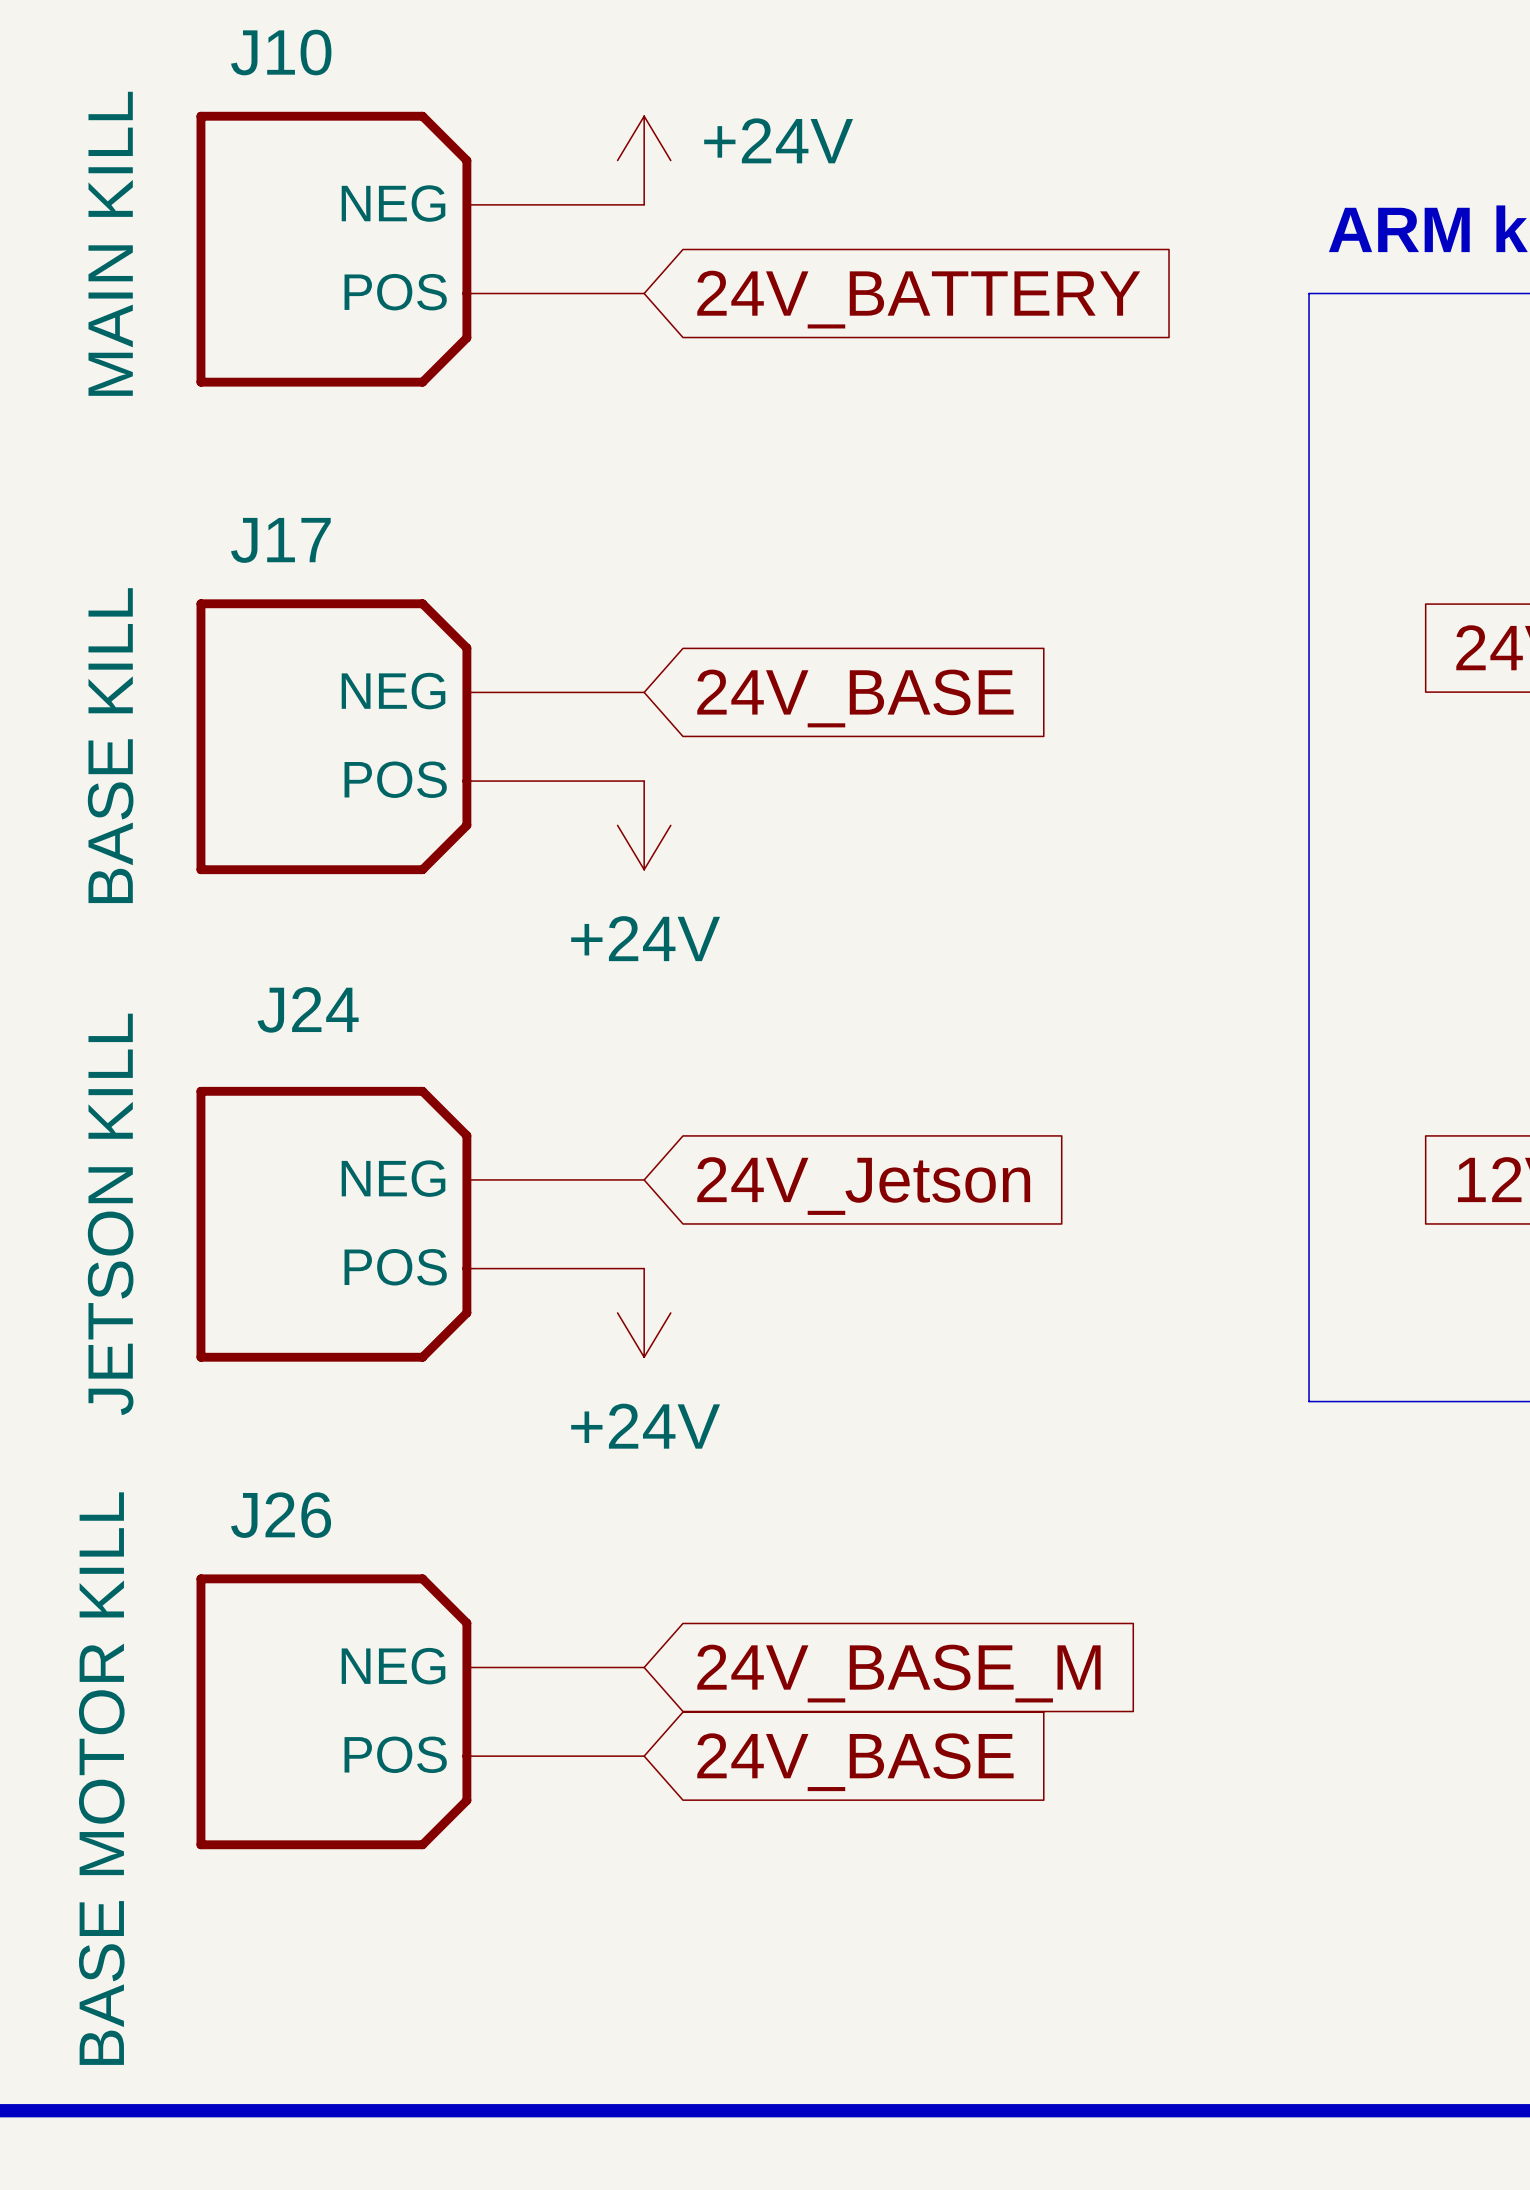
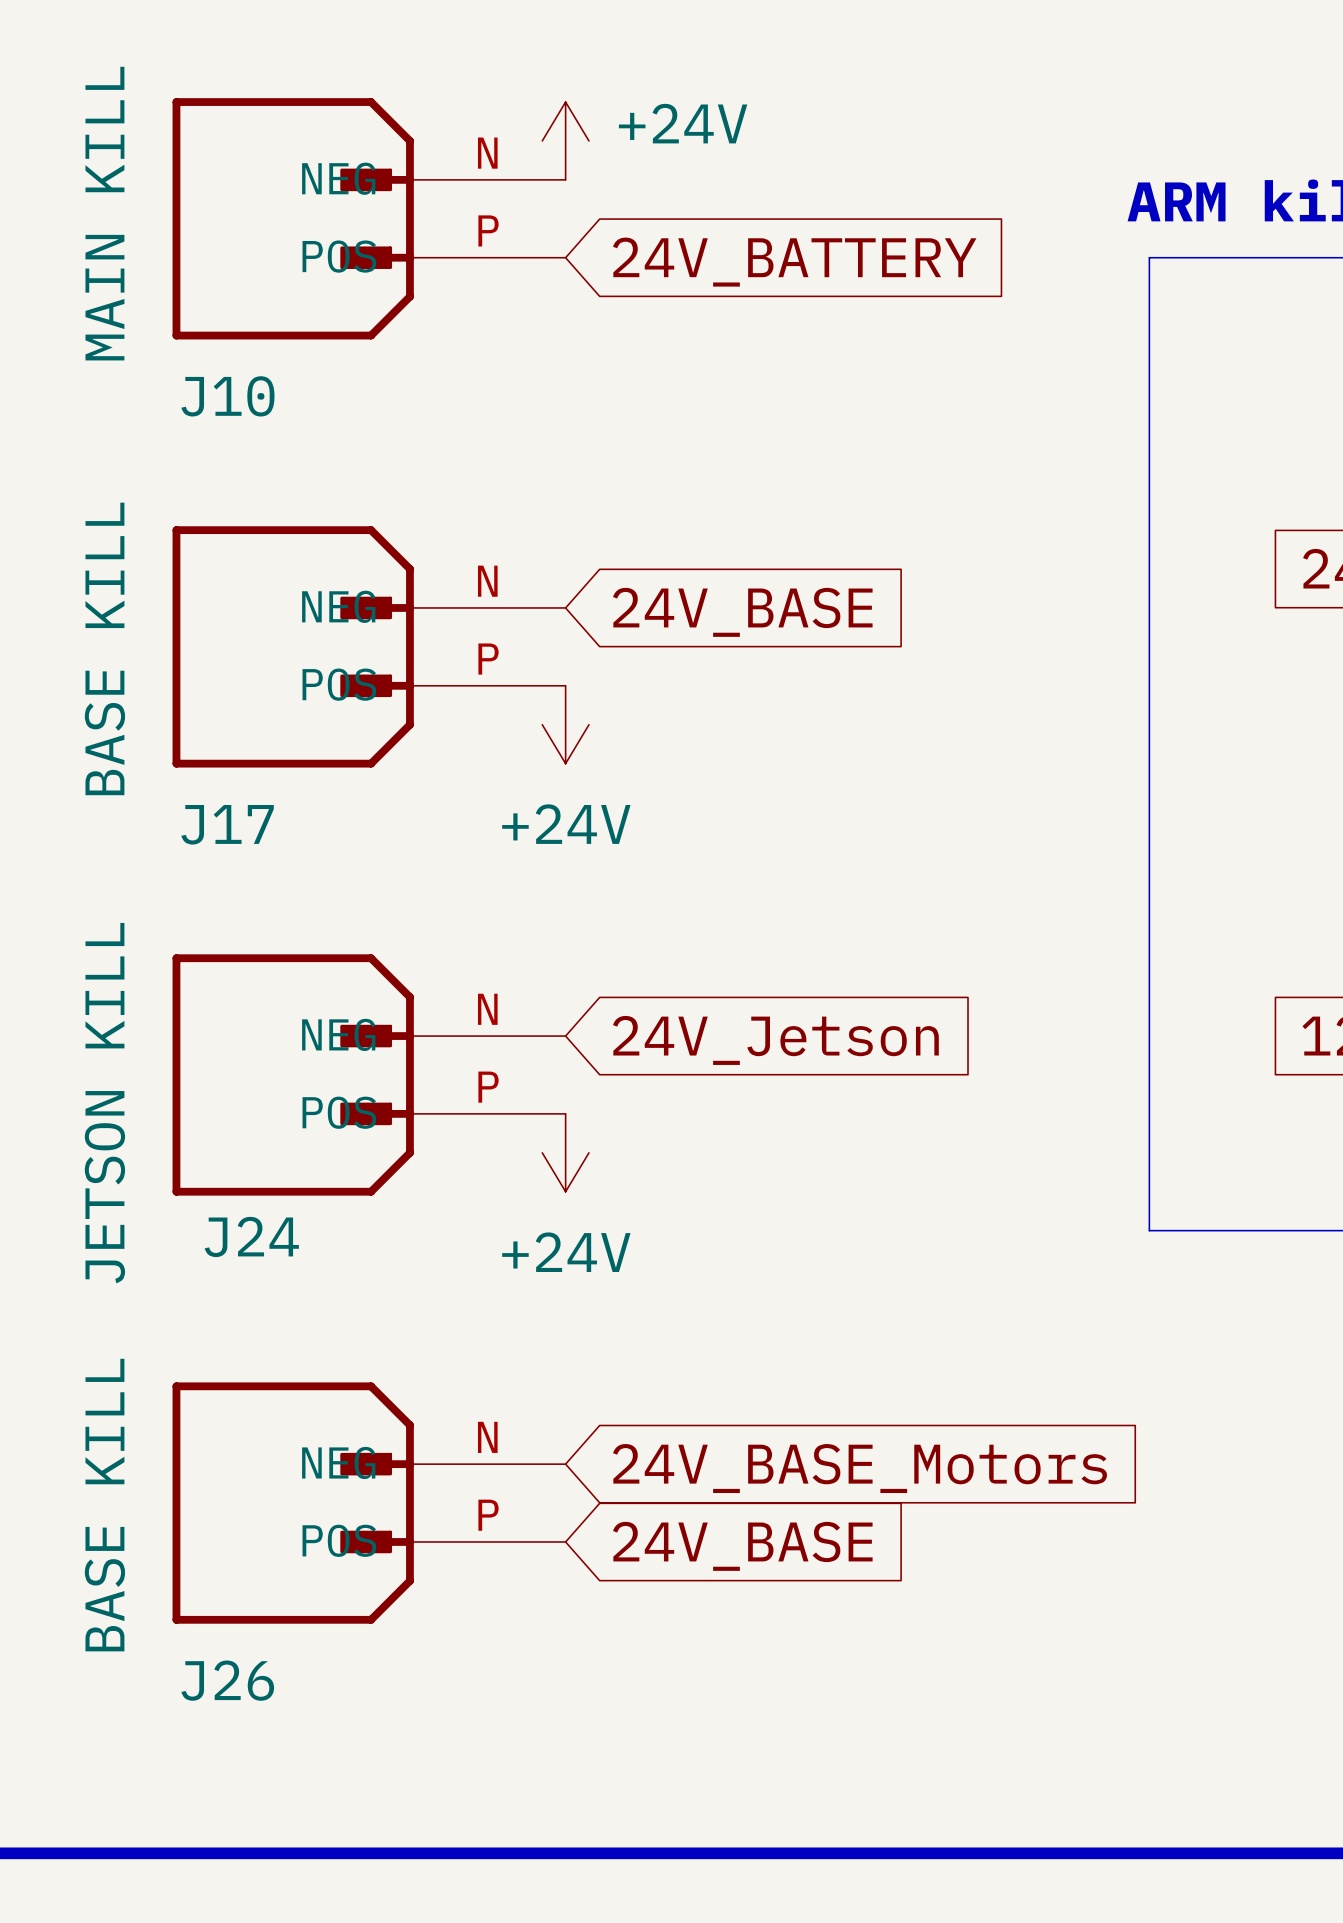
J10 name position: J10 (281, 52) -> J10 (227, 396)
J10 symbol: [196, 111, 645, 387] -> [172, 98, 566, 340]
J17 name position: J17 (280, 540) -> J17 (227, 824)
J17 symbol: [196, 599, 645, 875] -> [172, 526, 566, 768]
J24 name position: J24 (308, 1009) -> J24 (251, 1236)
J24 symbol: [196, 1086, 645, 1362] -> [172, 954, 566, 1196]
J26 name position: J26 (281, 1515) -> J26 (227, 1680)
J26 symbol: [196, 1574, 645, 1850] -> [172, 1382, 566, 1624]
global label: 24V_BASE_M (898, 1673) -> 24V_BASE_Motors (860, 1468)
J26 value: BASE MOTOR KILL (101, 1778) -> BASE KILL (104, 1505)

